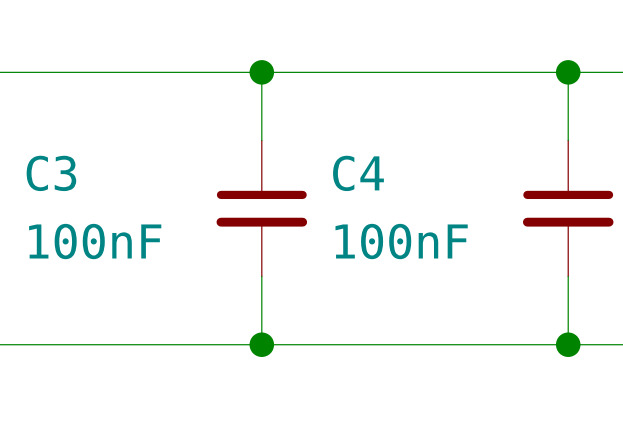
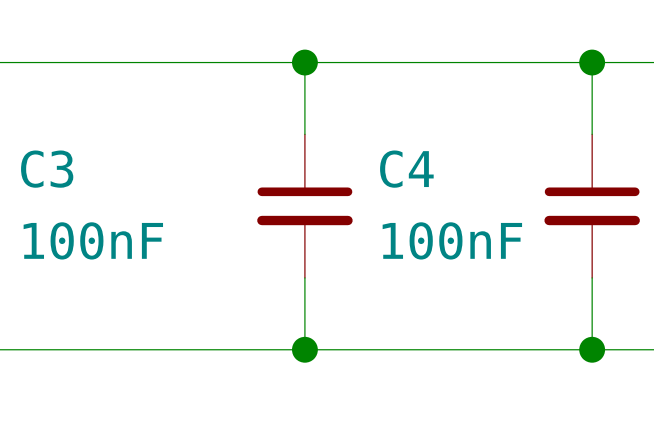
wire: (261, 72) (261, 140) -> (304, 62) (304, 134)
junction position: (261, 72) -> (304, 62)
C4 position: (261, 208) -> (304, 206)
wire: (261, 276) (261, 344) -> (304, 277) (304, 349)
junction position: (261, 344) -> (304, 349)

